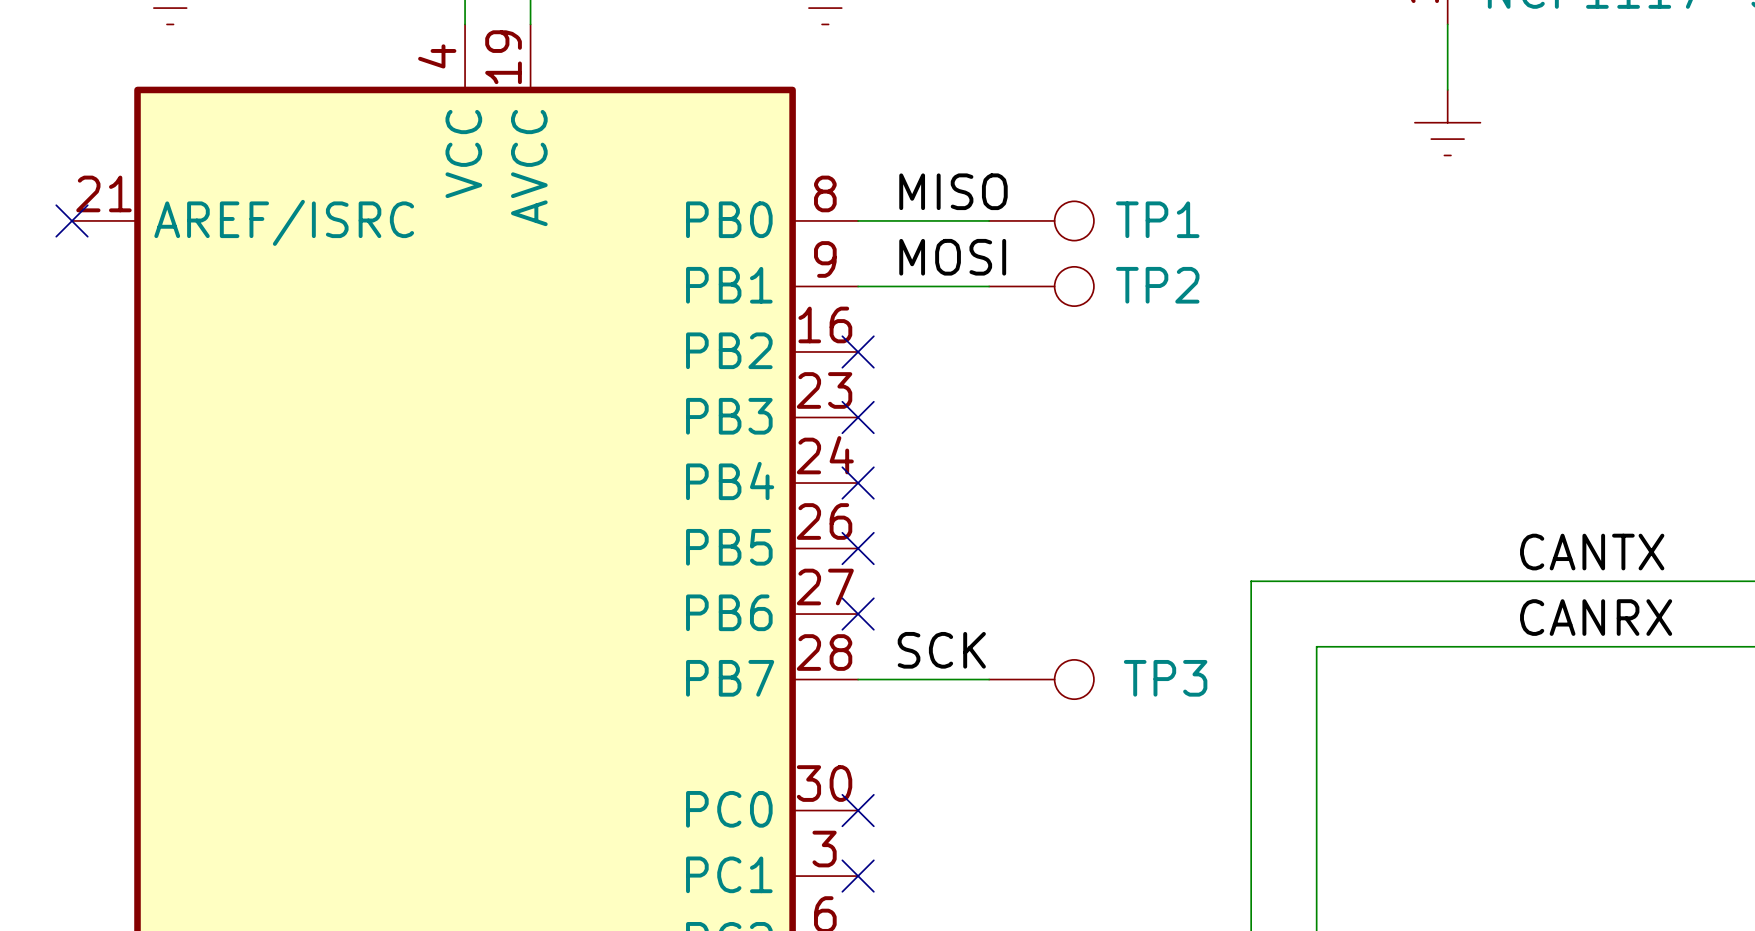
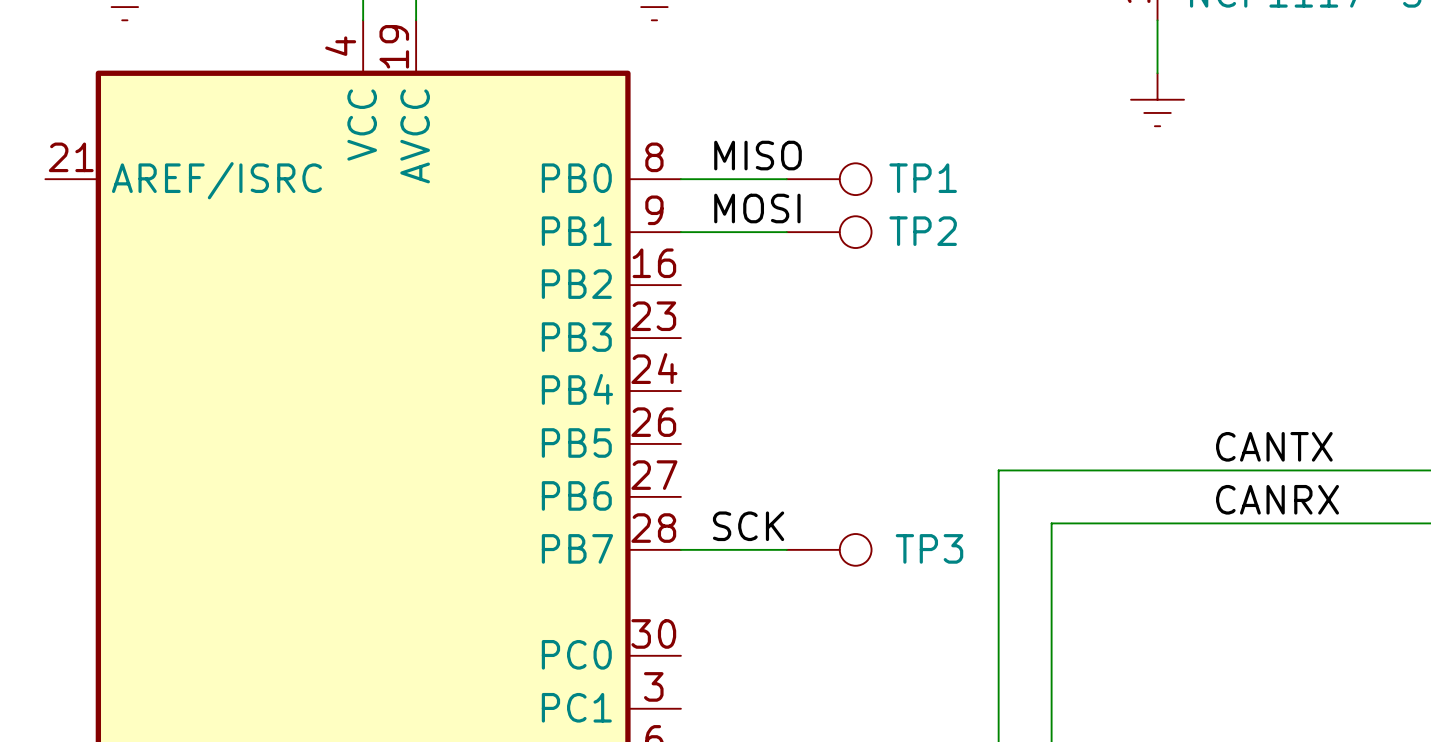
no-connect mark: (71, 220) -> none
no-connect mark: (858, 351) -> none
no-connect mark: (858, 417) -> none
no-connect mark: (858, 483) -> none
no-connect mark: (858, 548) -> none
no-connect mark: (858, 614) -> none
no-connect mark: (858, 810) -> none
no-connect mark: (858, 876) -> none

